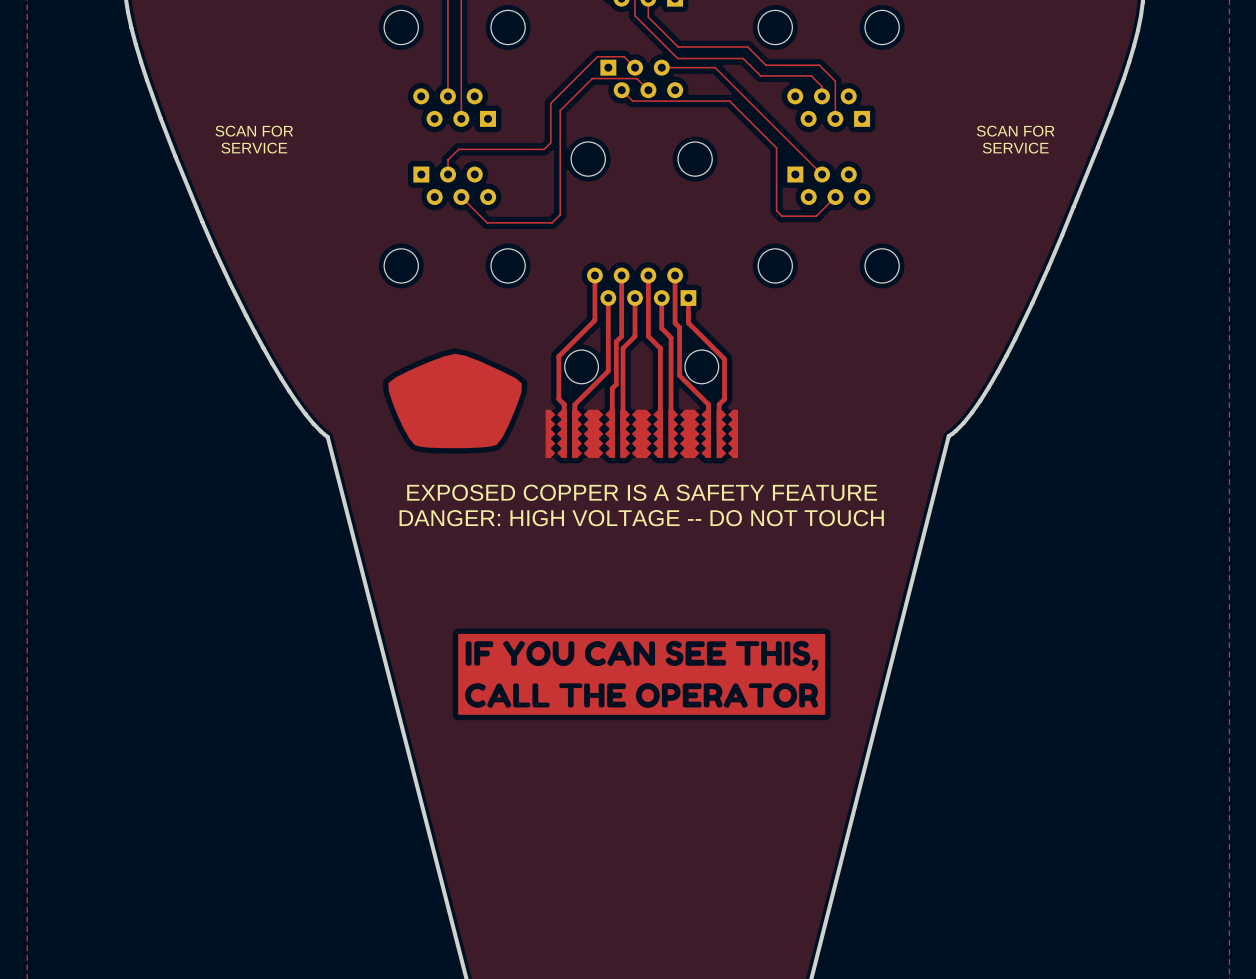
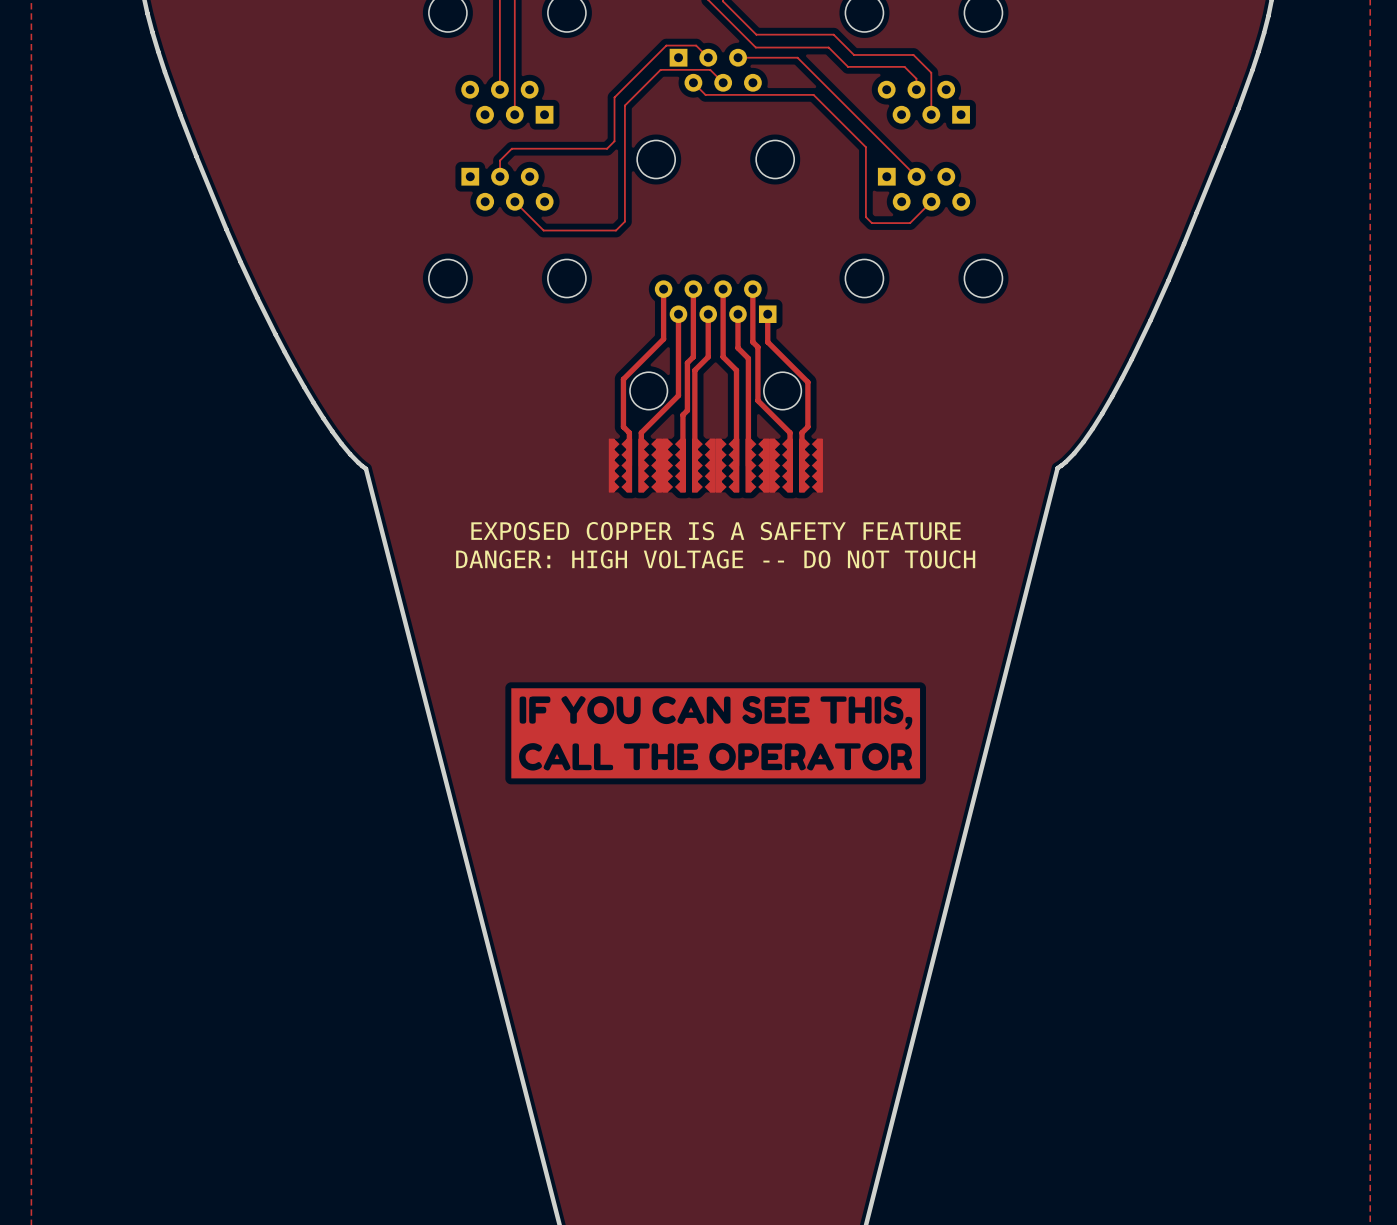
text: SCAN FOR (254, 131) -> none
text: SCAN FOR (1015, 131) -> none
text: SERVICE (254, 148) -> none
text: SERVICE (1015, 148) -> none
drawing: [388, 353, 522, 449] -> none

